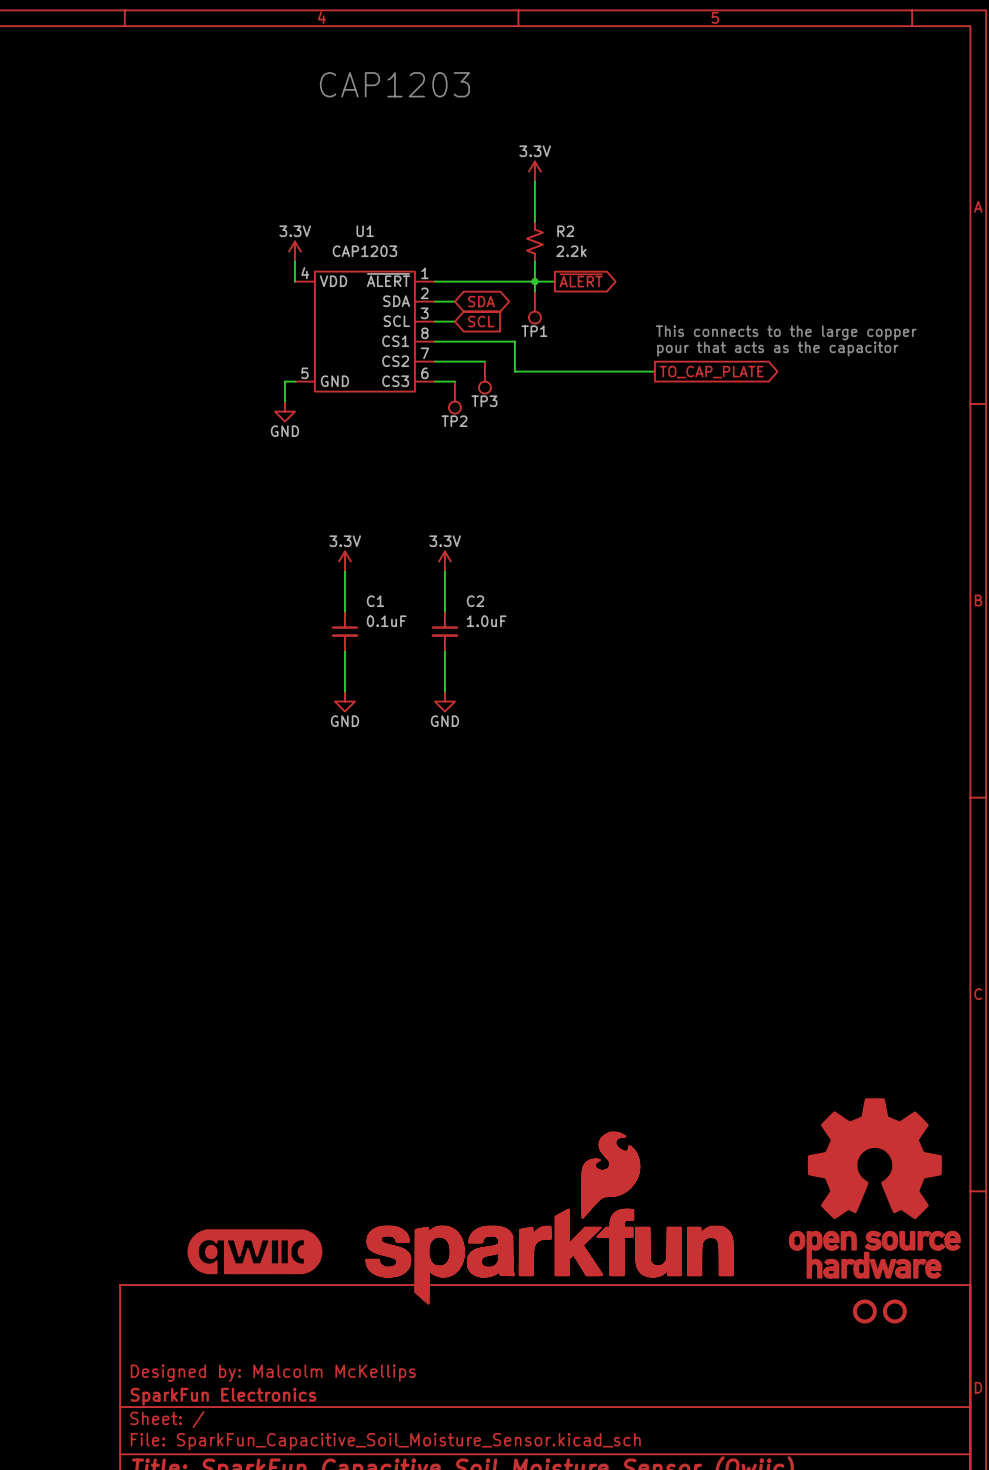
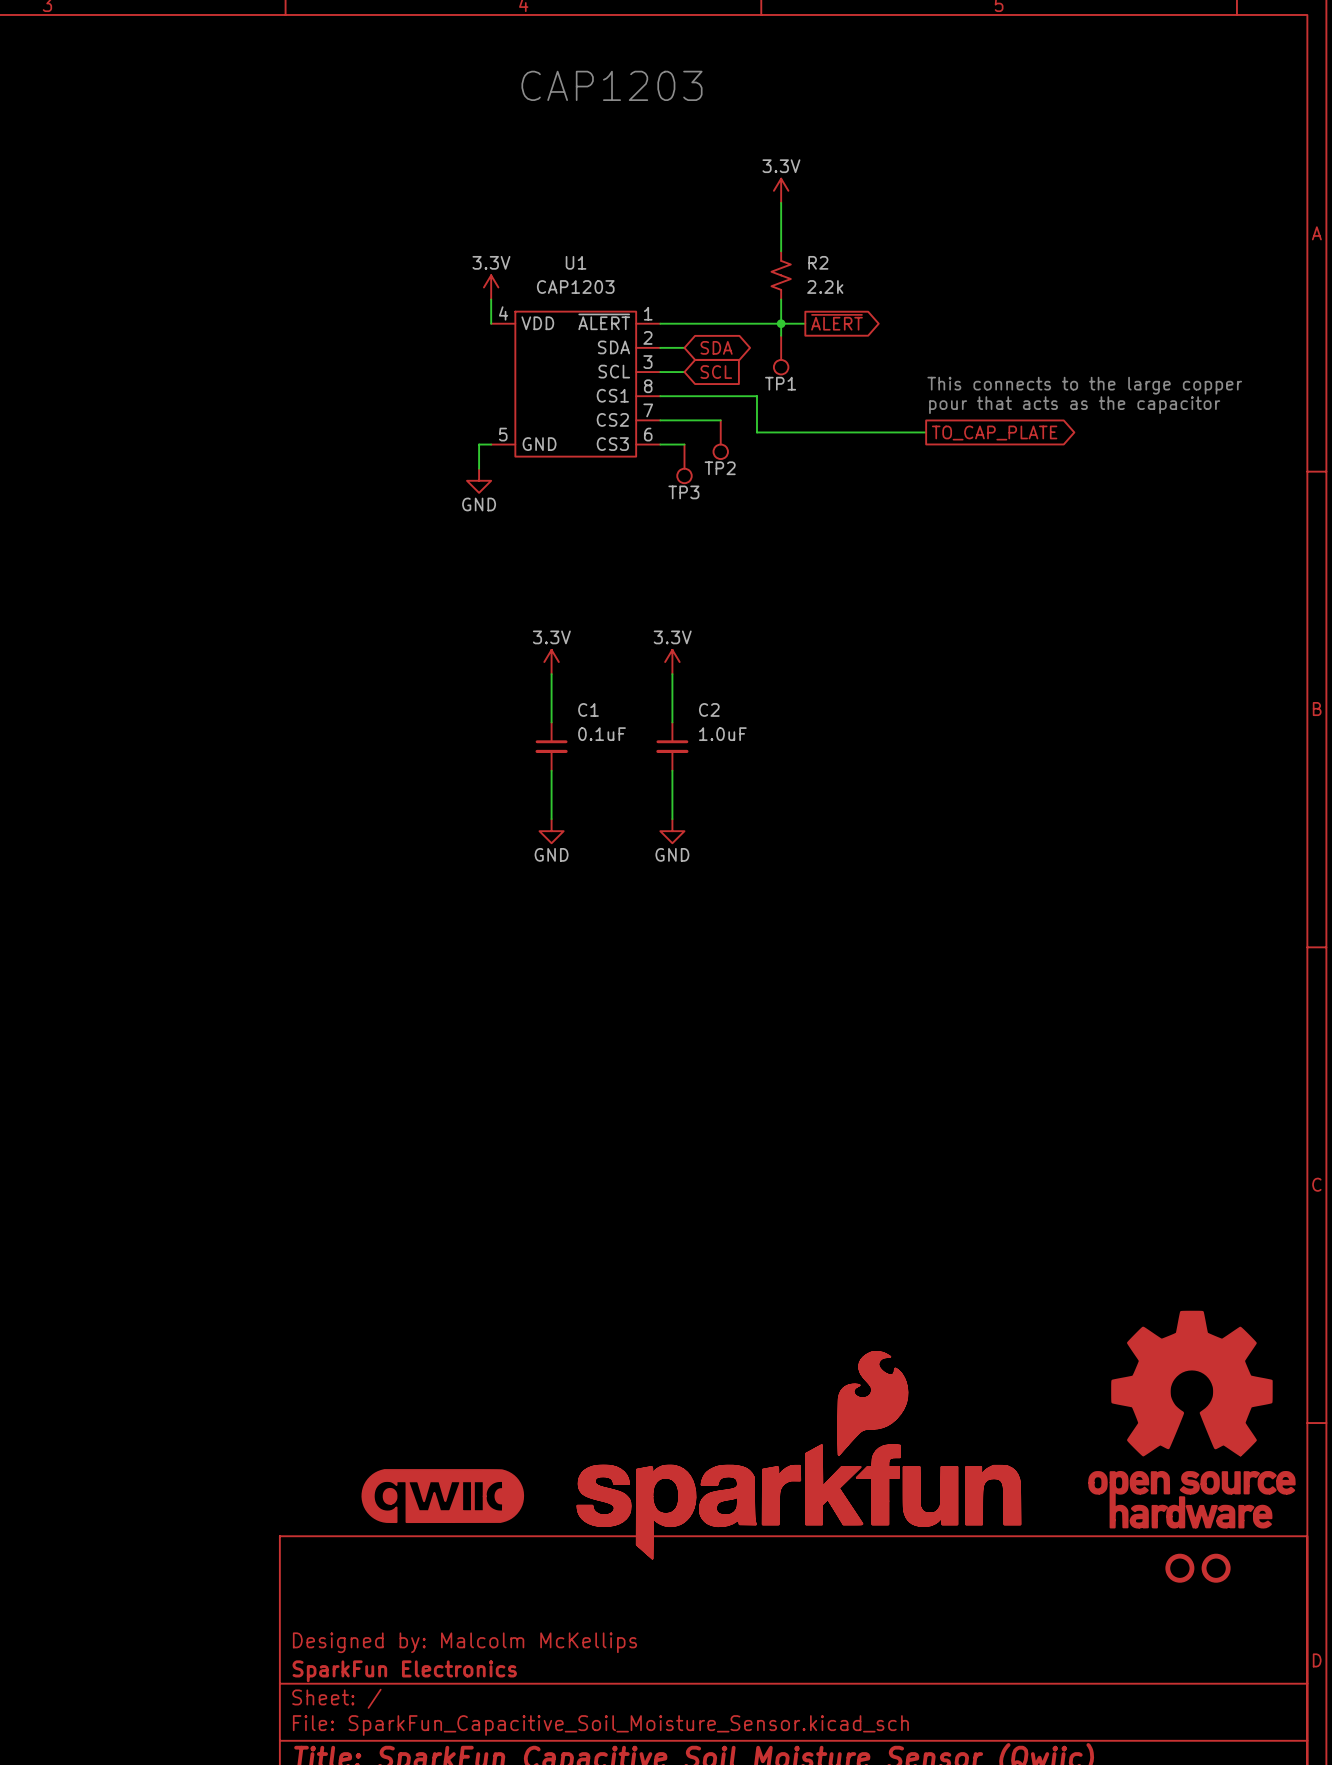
TP3 name: TP3 (484, 401) -> TP2 (720, 468)
TP2 name: TP2 (454, 421) -> TP3 (683, 492)

